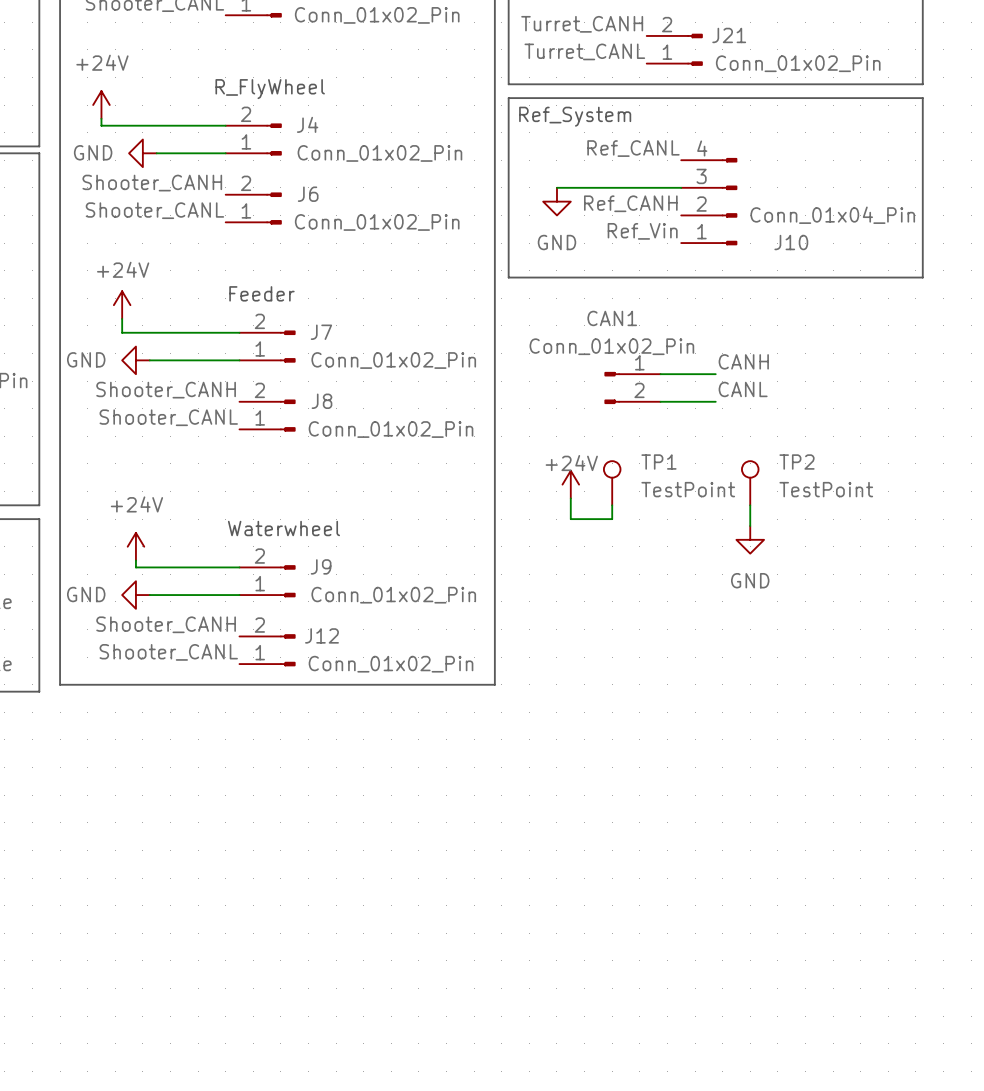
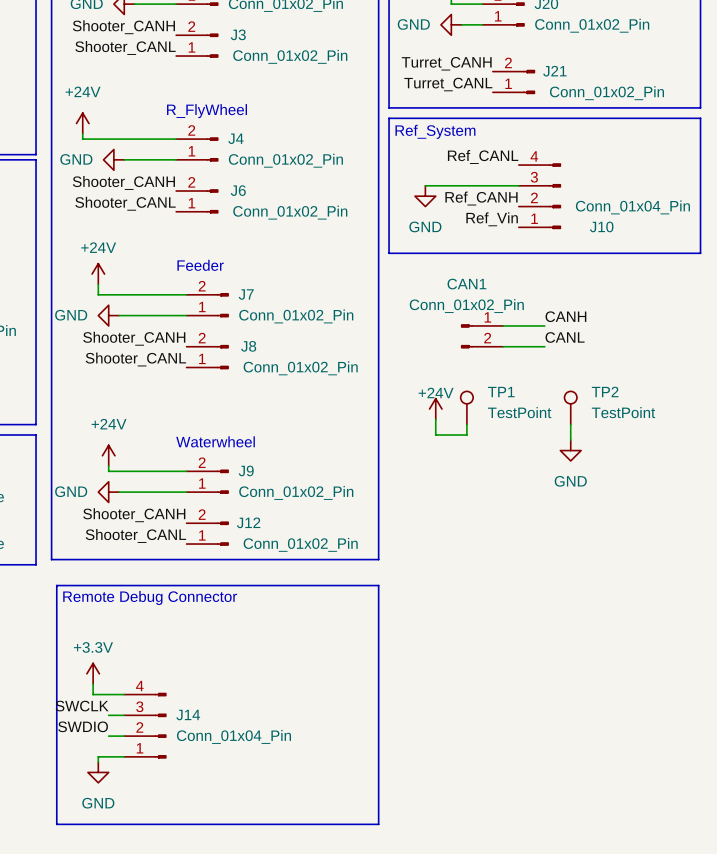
line: none -> (56, 585) (378, 585) (378, 824) (56, 824) (56, 585)
text: none -> Remote Debug Connector (150, 597)
power symbol: none -> +3.3V (93, 673)
wire: none -> (93, 684) (93, 694) (124, 694)
label: none -> SWCLK (82, 706)
wire: none -> (108, 715) (124, 715)
J14: none -> Conn_01x04_Pin (145, 725)
label: none -> SWDIO (83, 726)
wire: none -> (108, 736) (124, 736)
wire: none -> (124, 756) (98, 756) (98, 762)
power symbol: none -> GND (98, 772)

